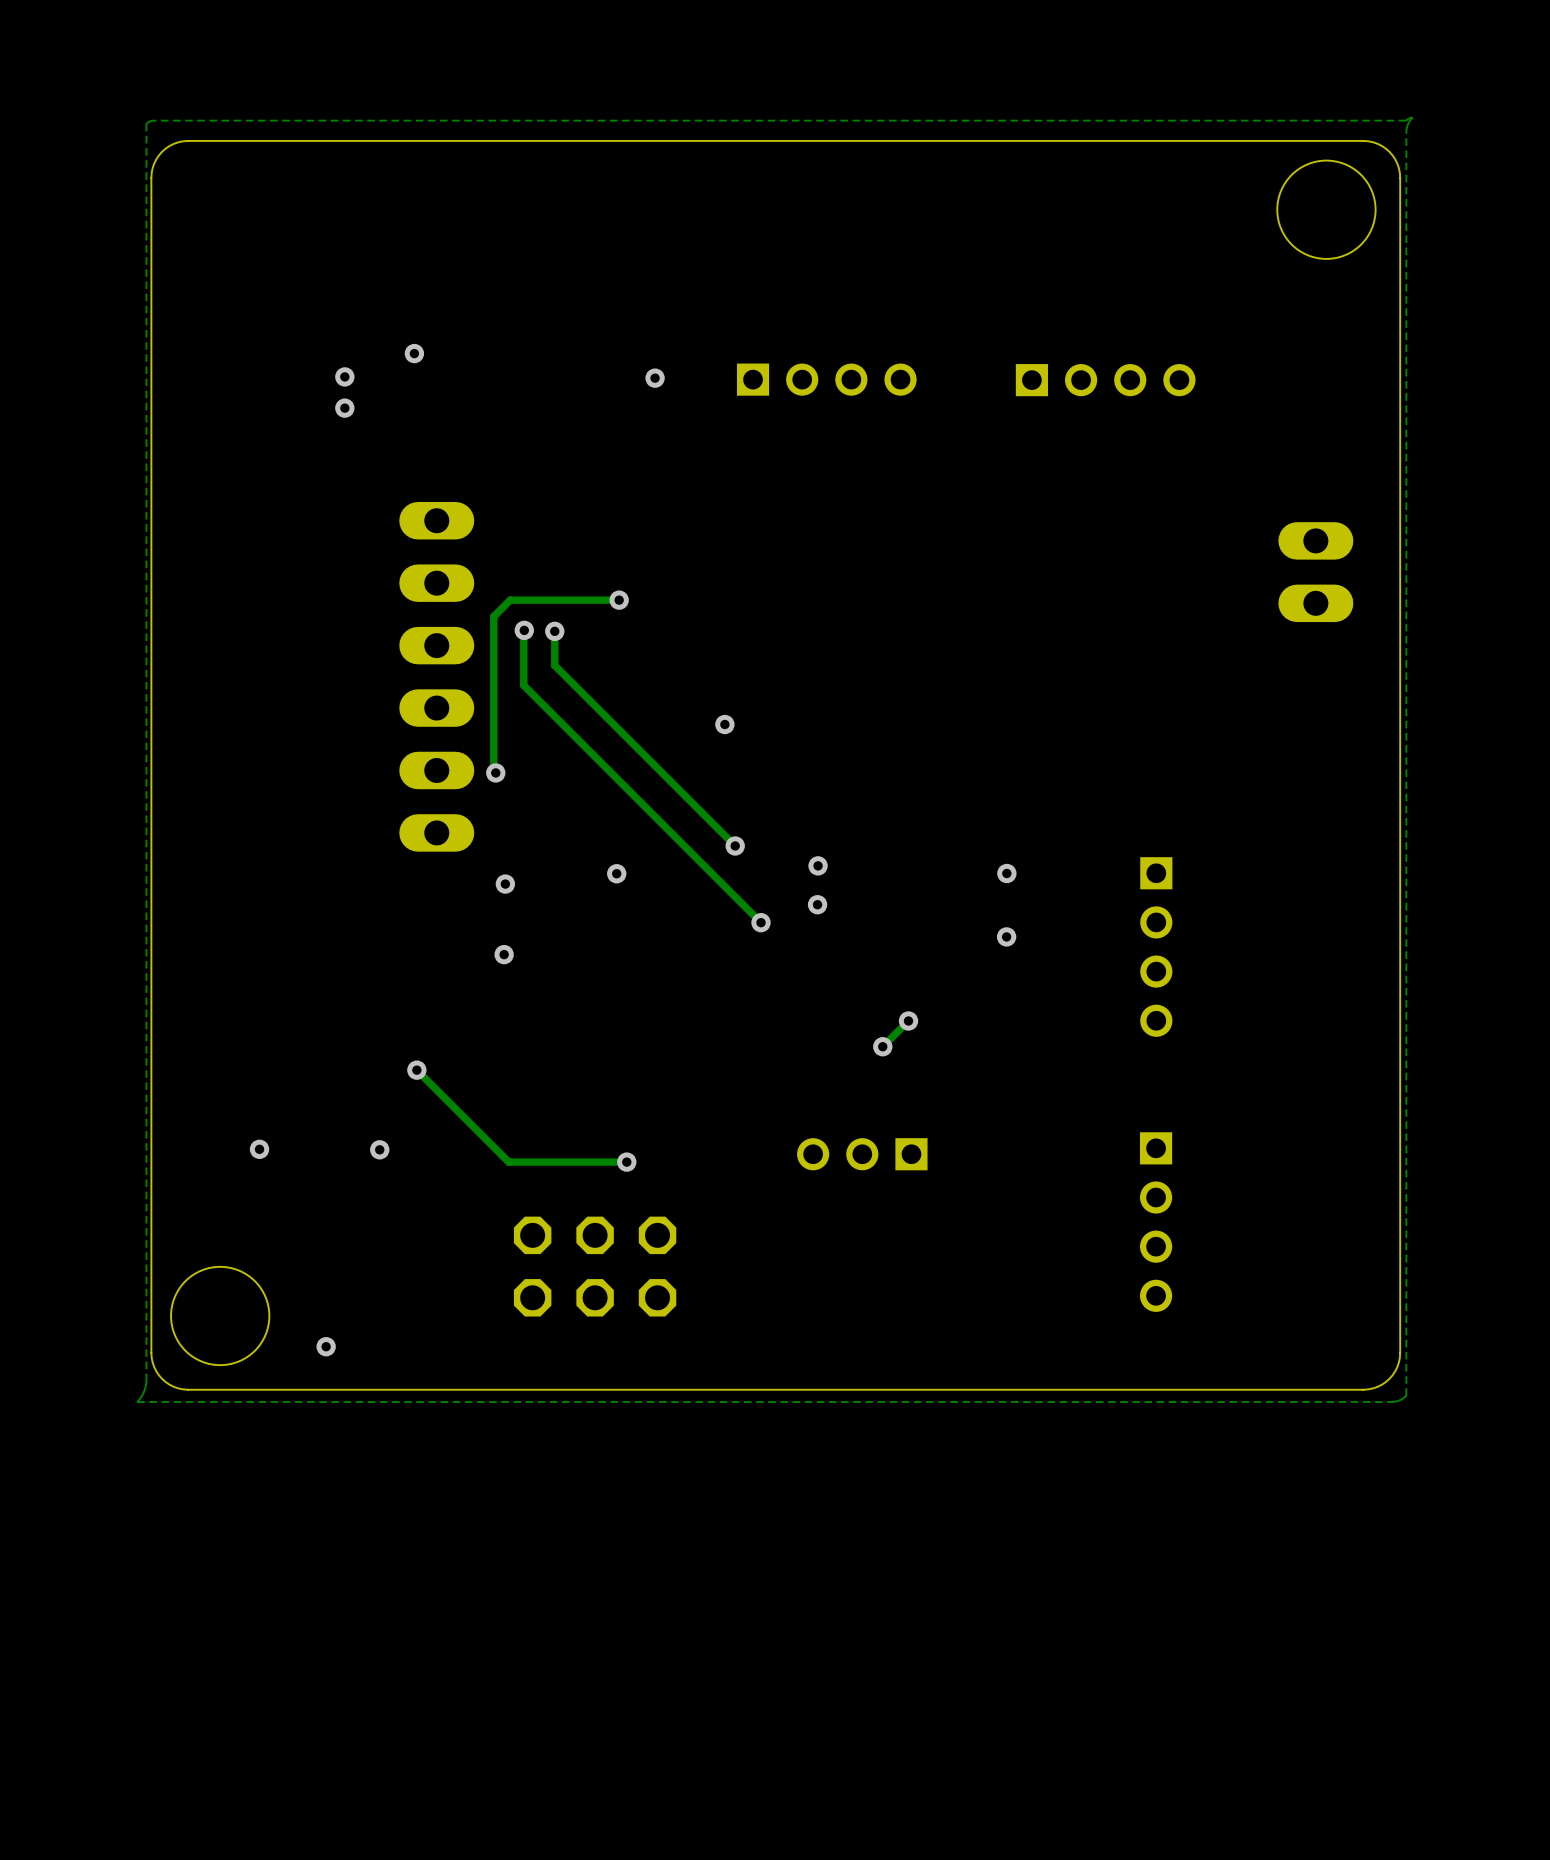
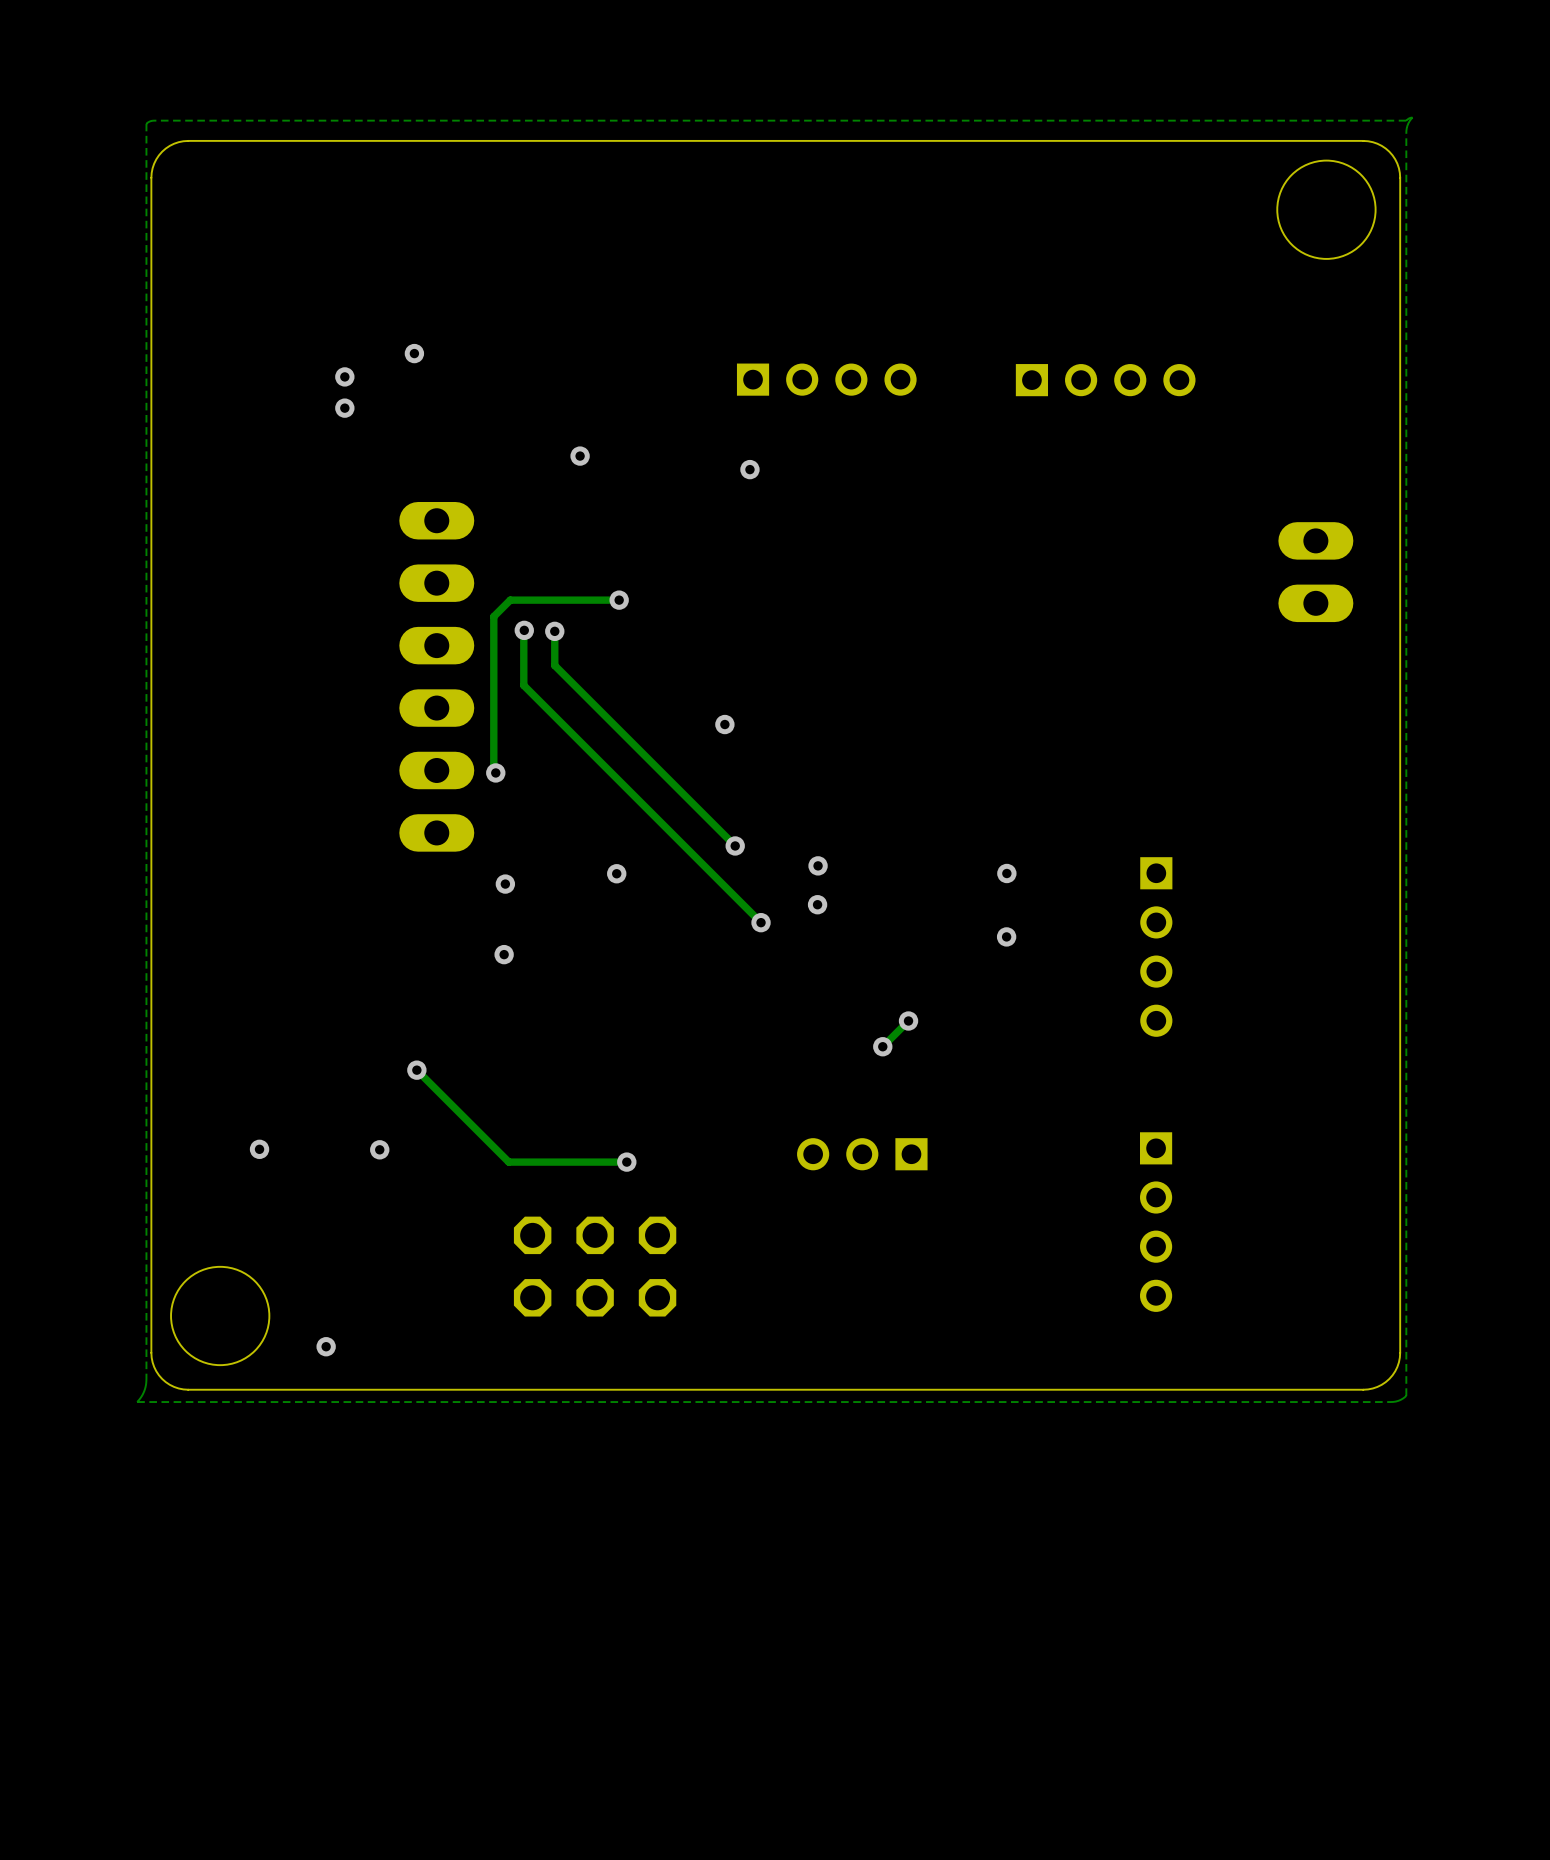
via: (655, 378) -> none
via: none -> (580, 456)
via: none -> (749, 469)

